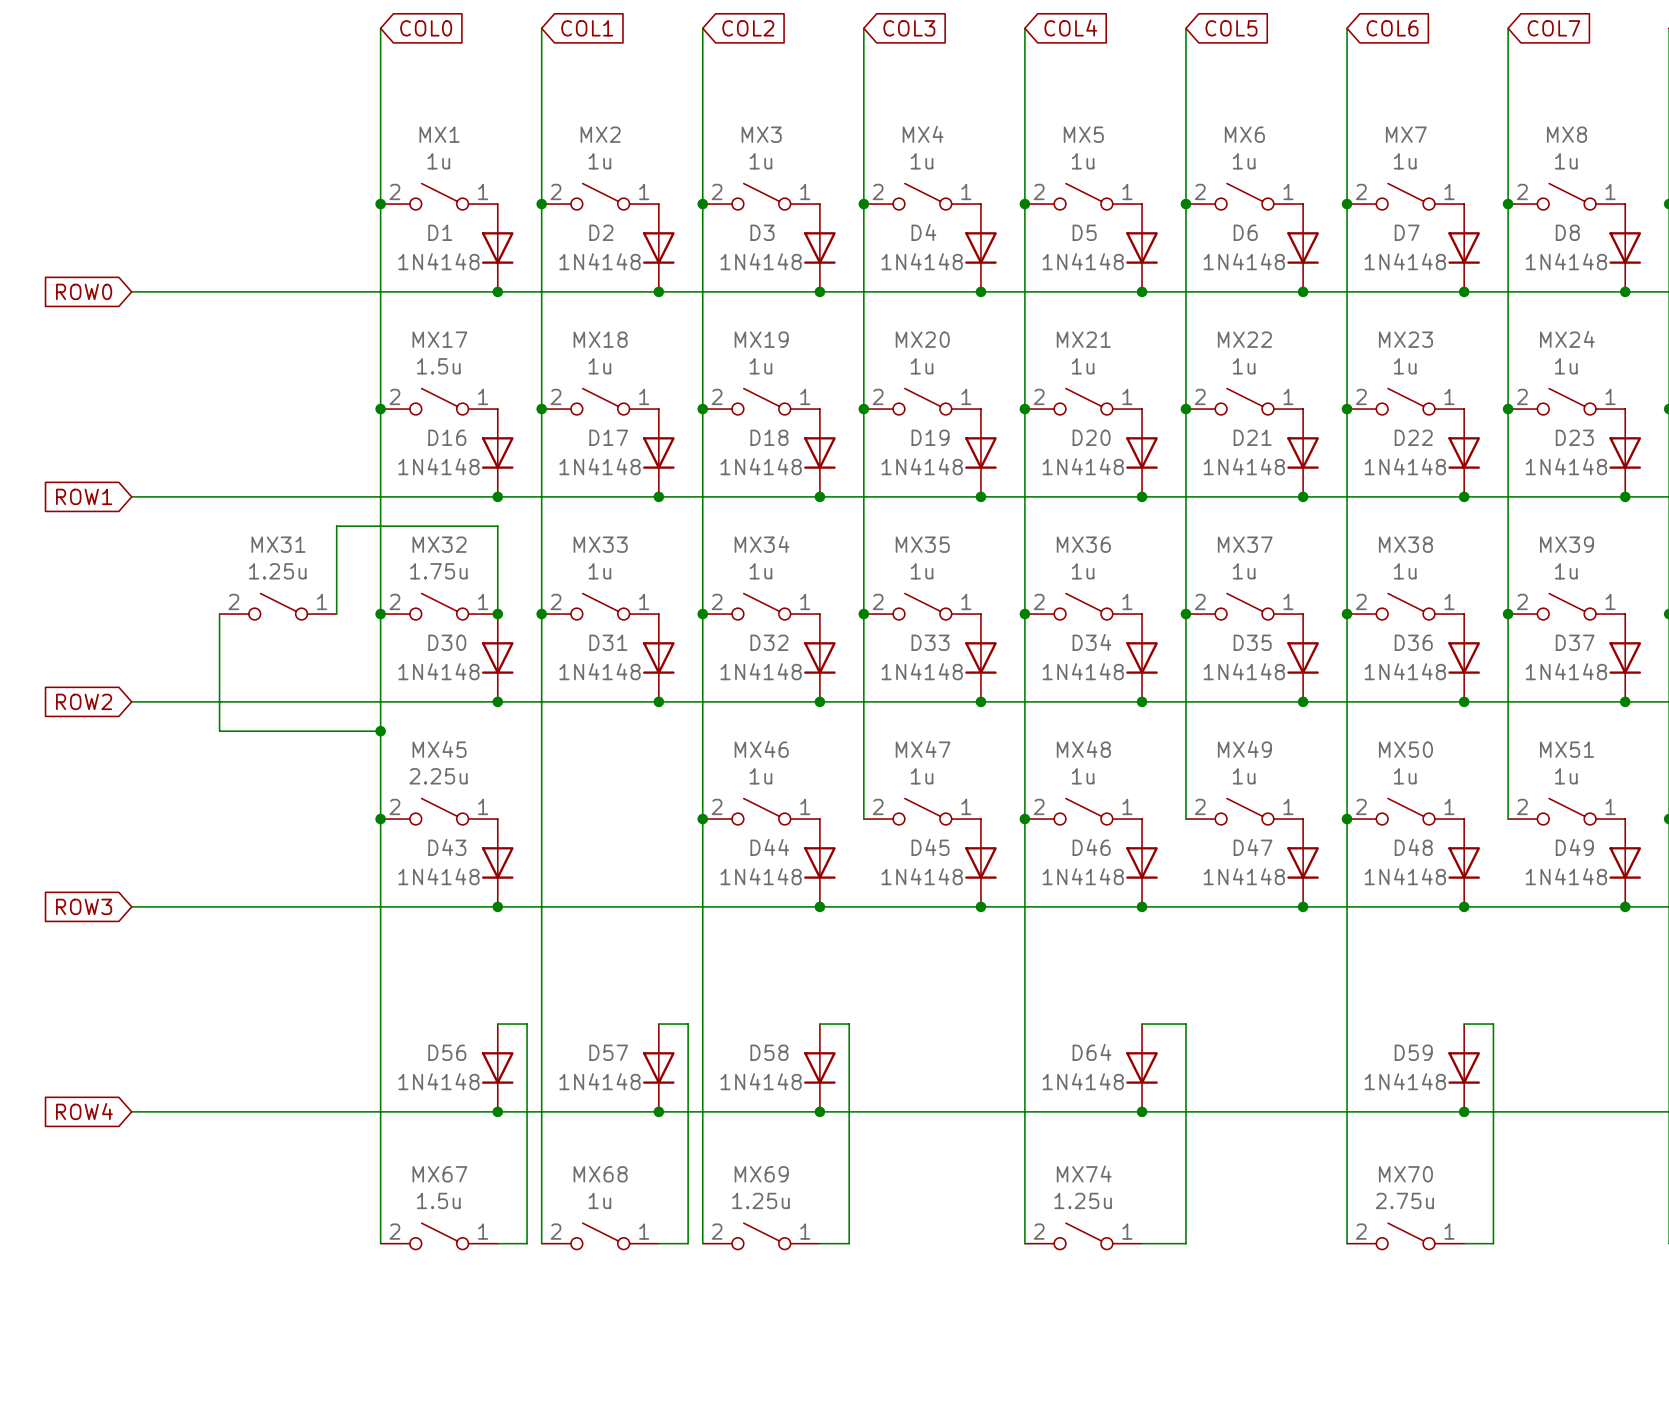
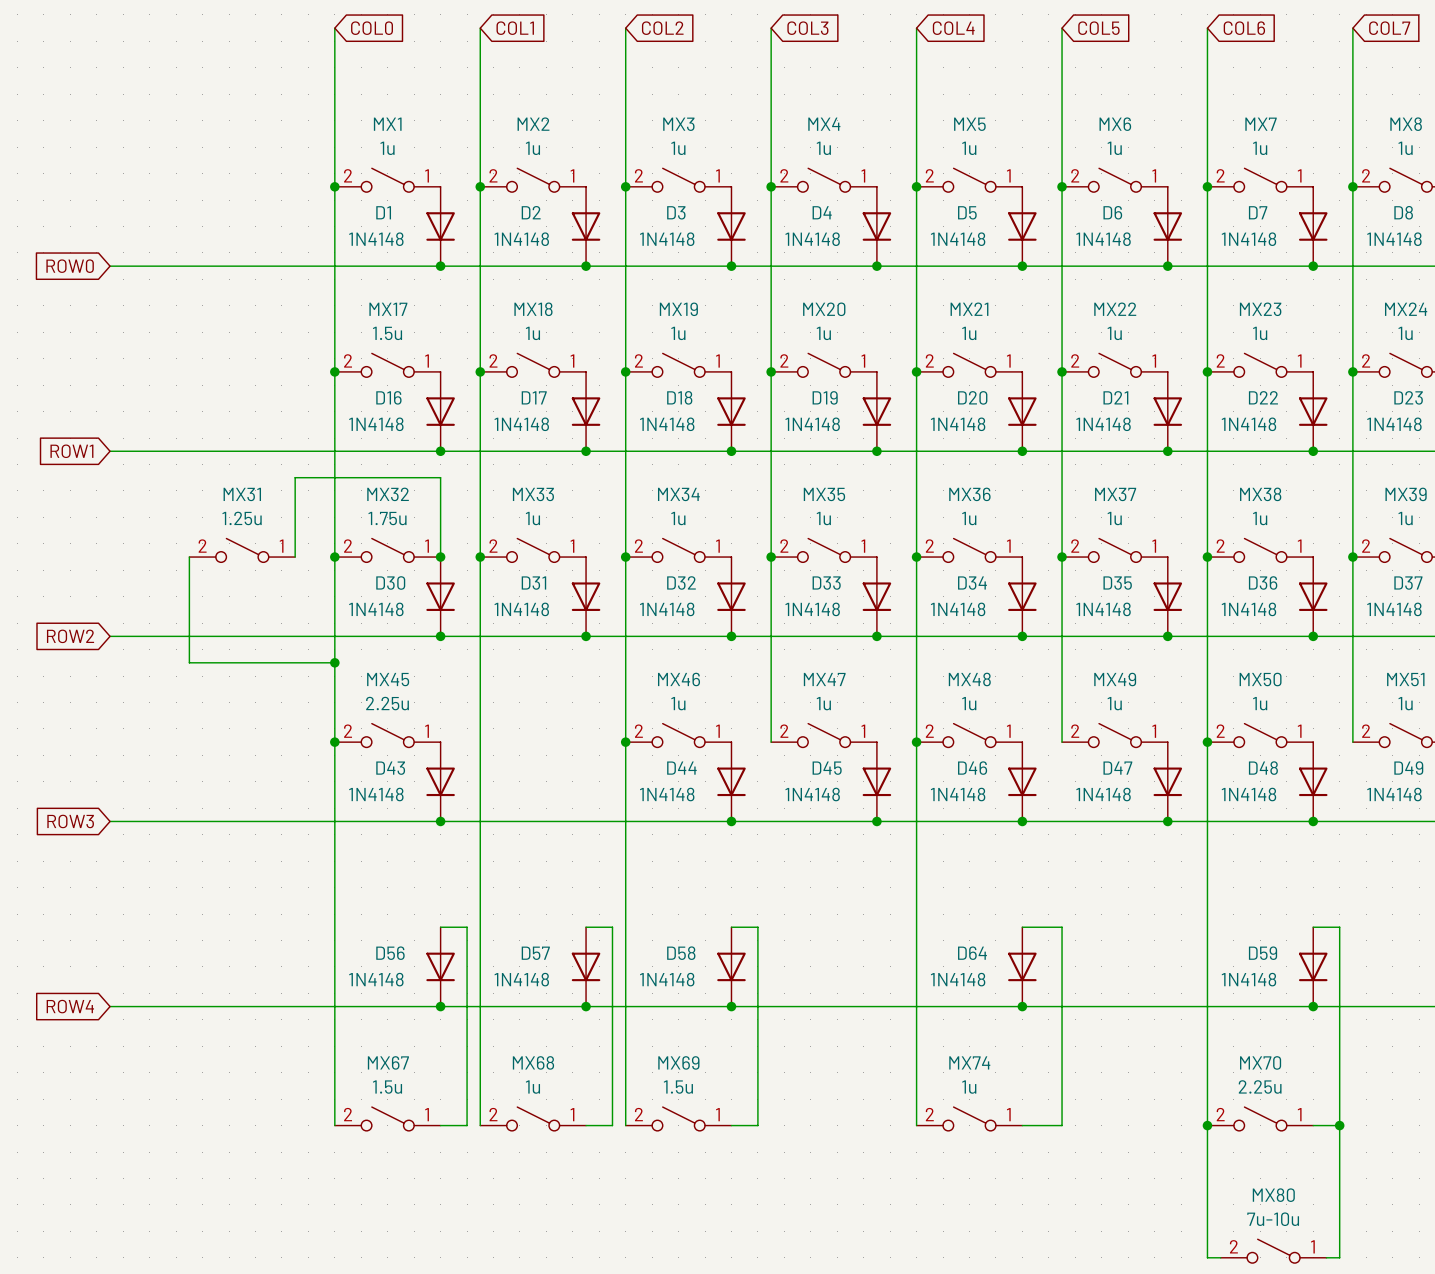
MX69 value: 1.25u (760, 1200) -> 1.5u (678, 1087)
MX74 value: 1.25u (1083, 1200) -> 1u (969, 1087)
MX70 value: 2.75u (1404, 1200) -> 2.25u (1260, 1086)
wire: none -> (1207, 1125) (1207, 1257) (1220, 1257)
junction: none -> (1207, 1125)
wire: none -> (1339, 1125) (1339, 1257) (1326, 1257)
junction: none -> (1339, 1125)
MX80: none -> 7u-10u (1273, 1251)

